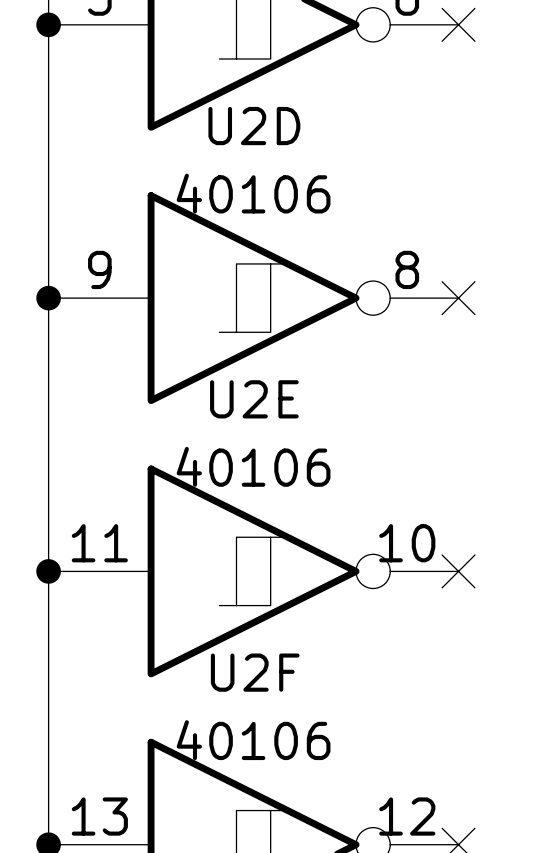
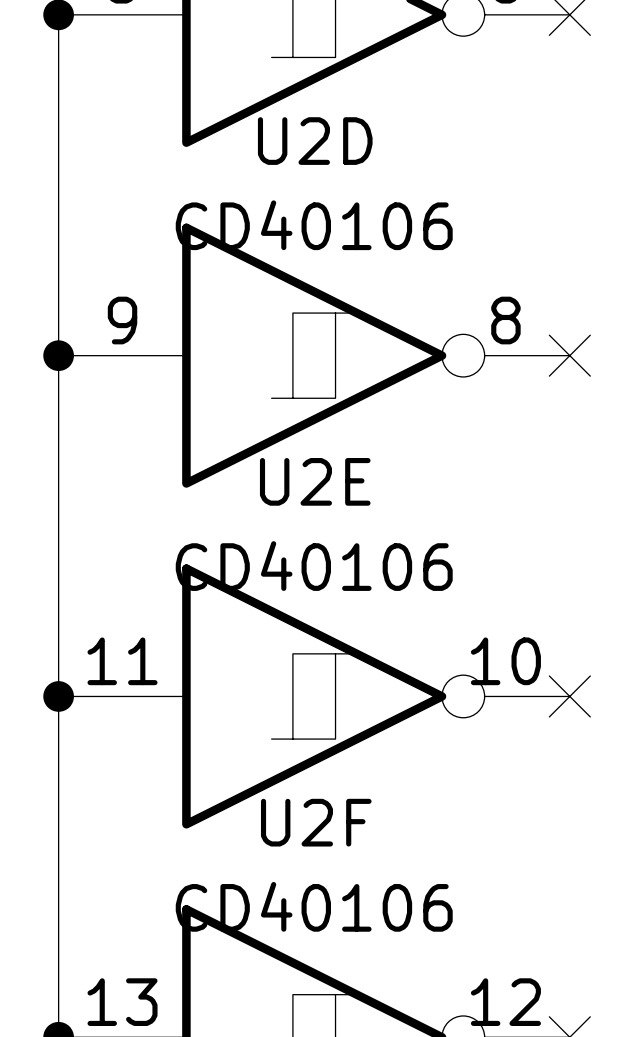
U2D value: 40106 (253, 193) -> CD40106 (314, 225)
U2E value: 40106 (253, 466) -> CD40106 (314, 566)
U2F value: 40106 (253, 740) -> CD40106 (314, 906)

